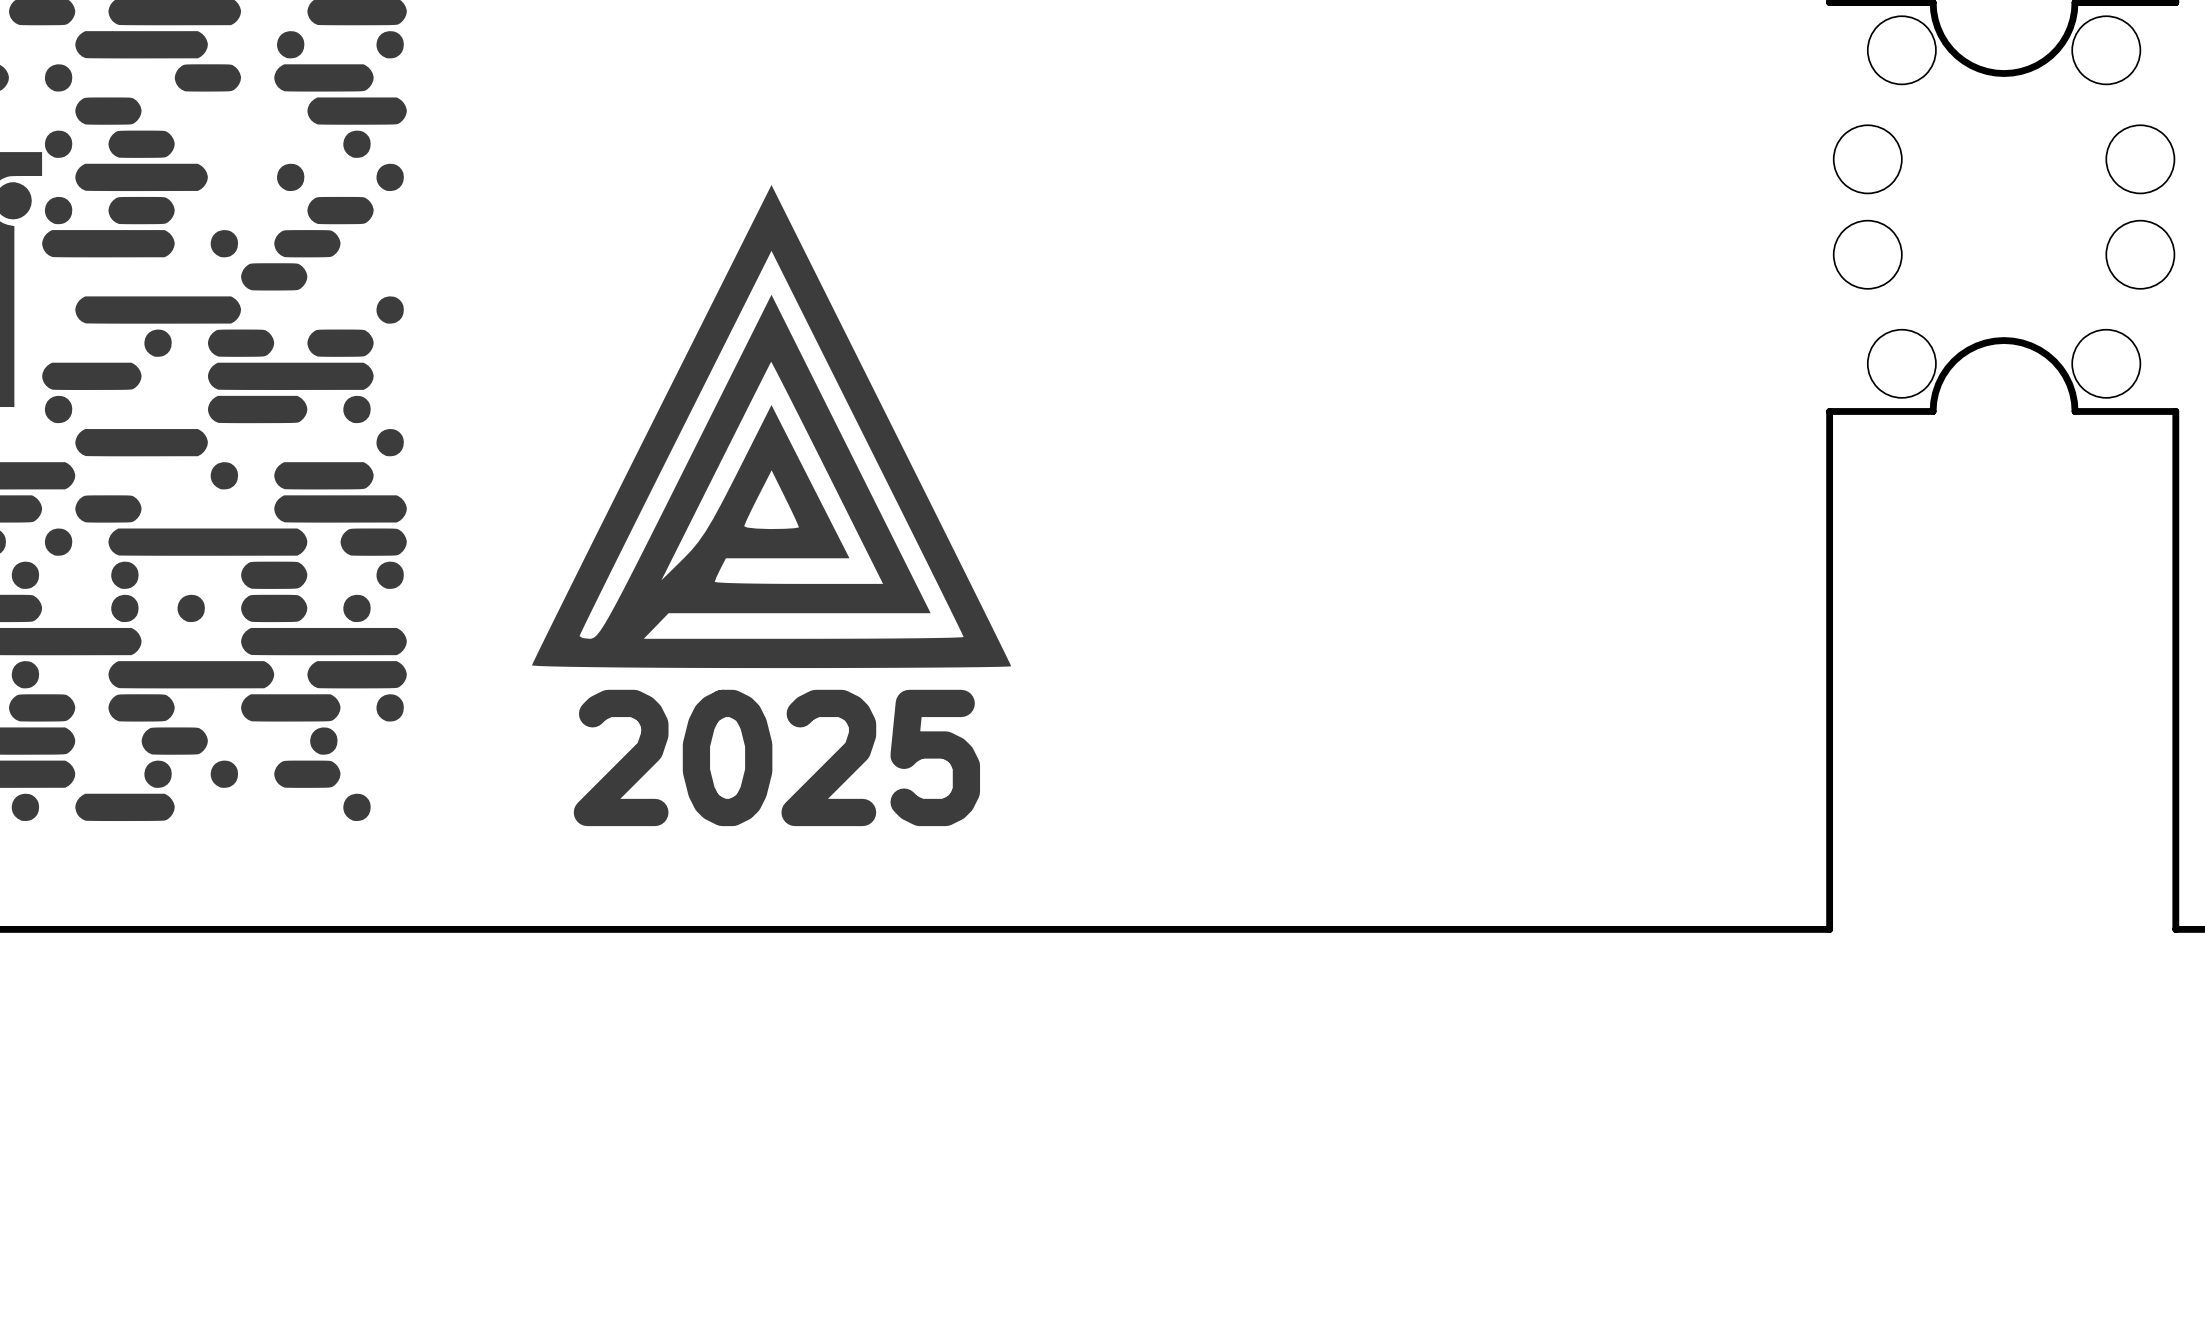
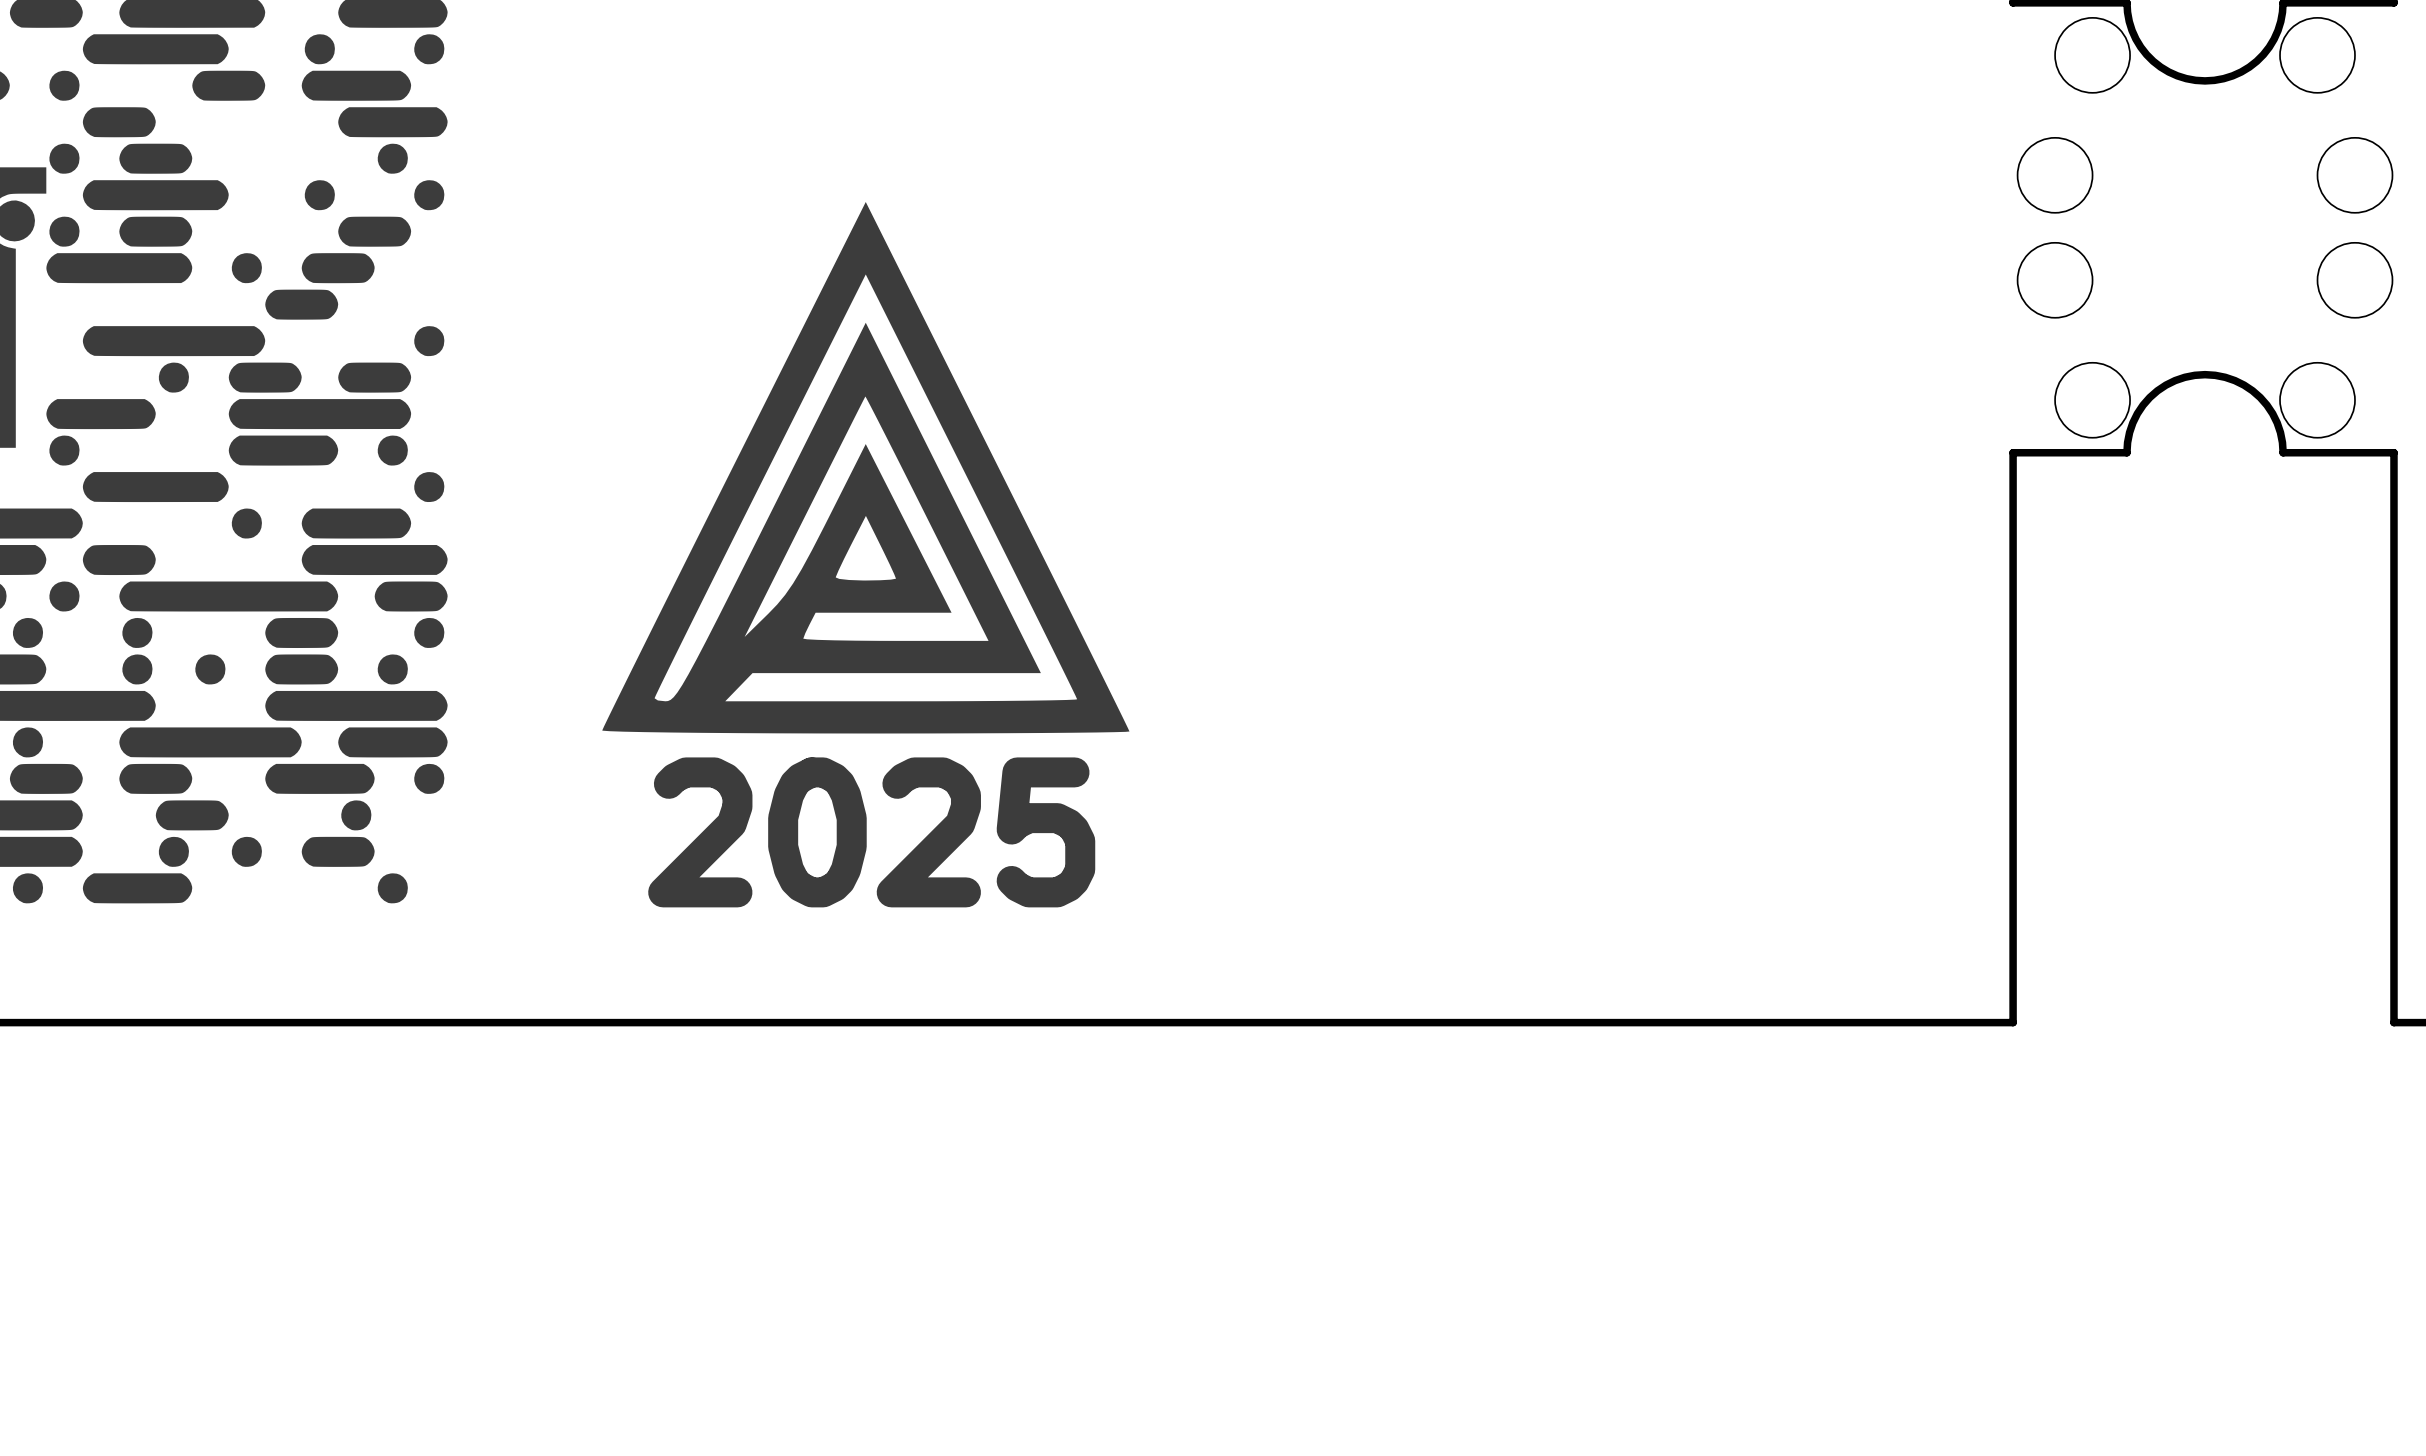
drawing position: (771, 426) -> (865, 467)
text position: 2025 (776, 757) -> 2025 (871, 832)

